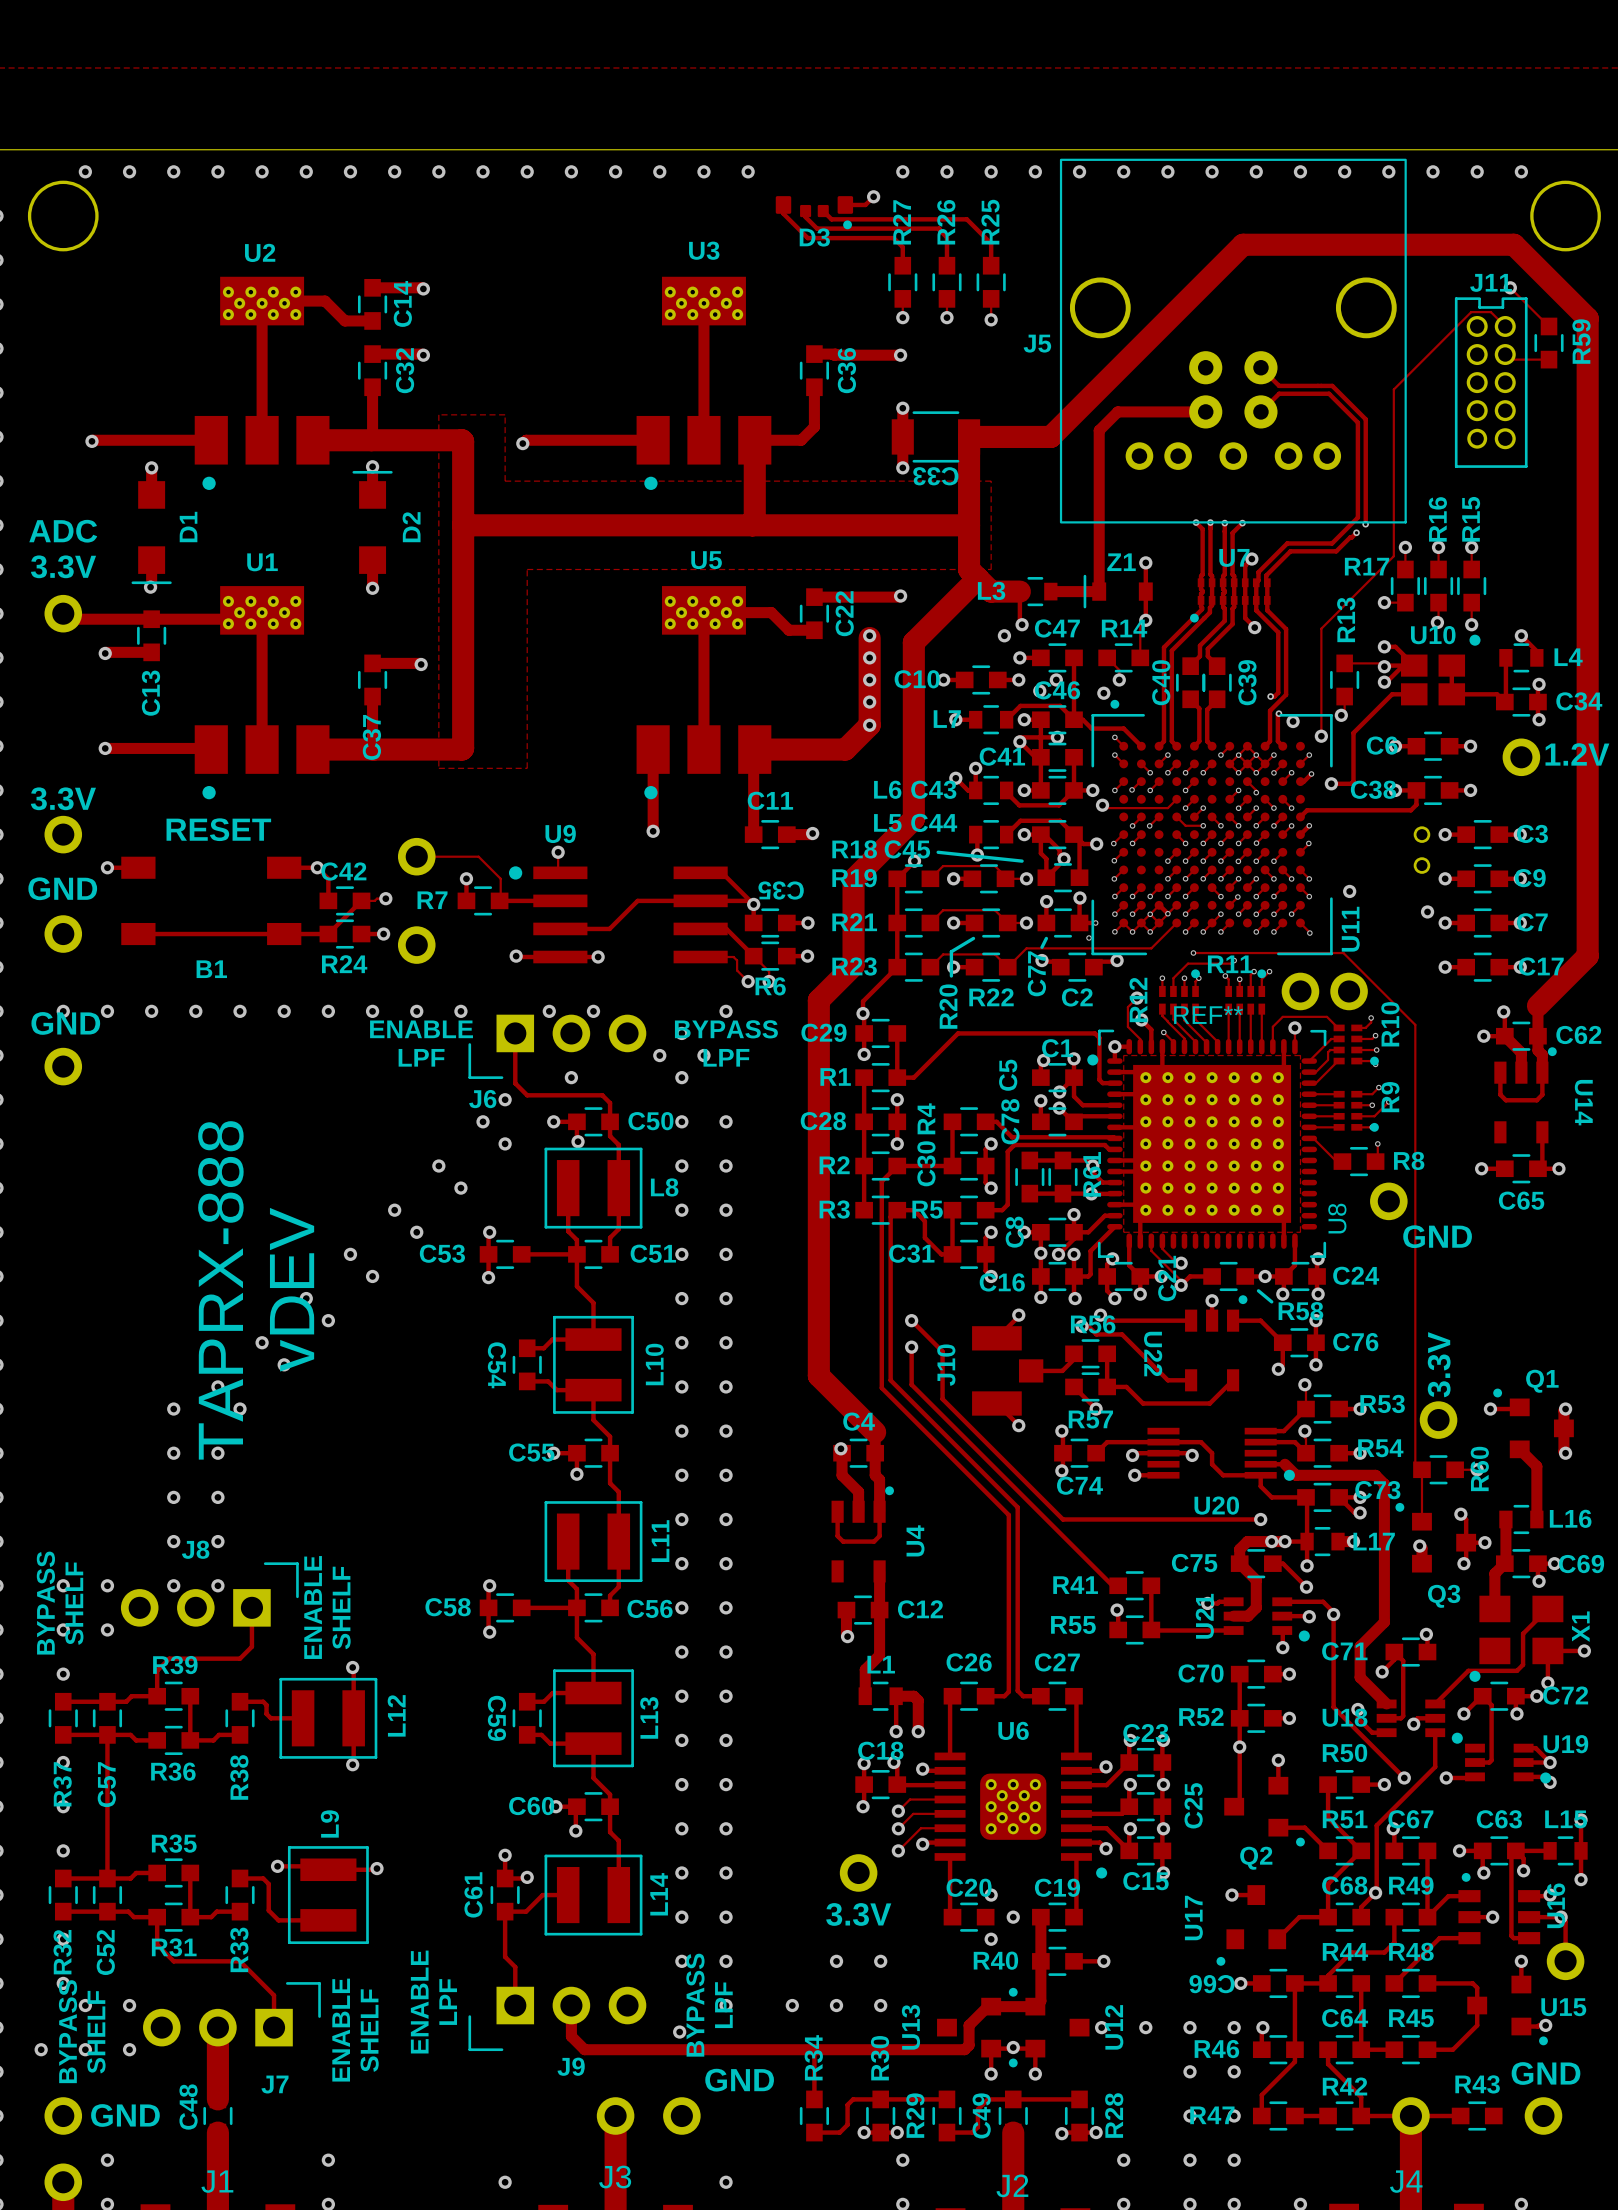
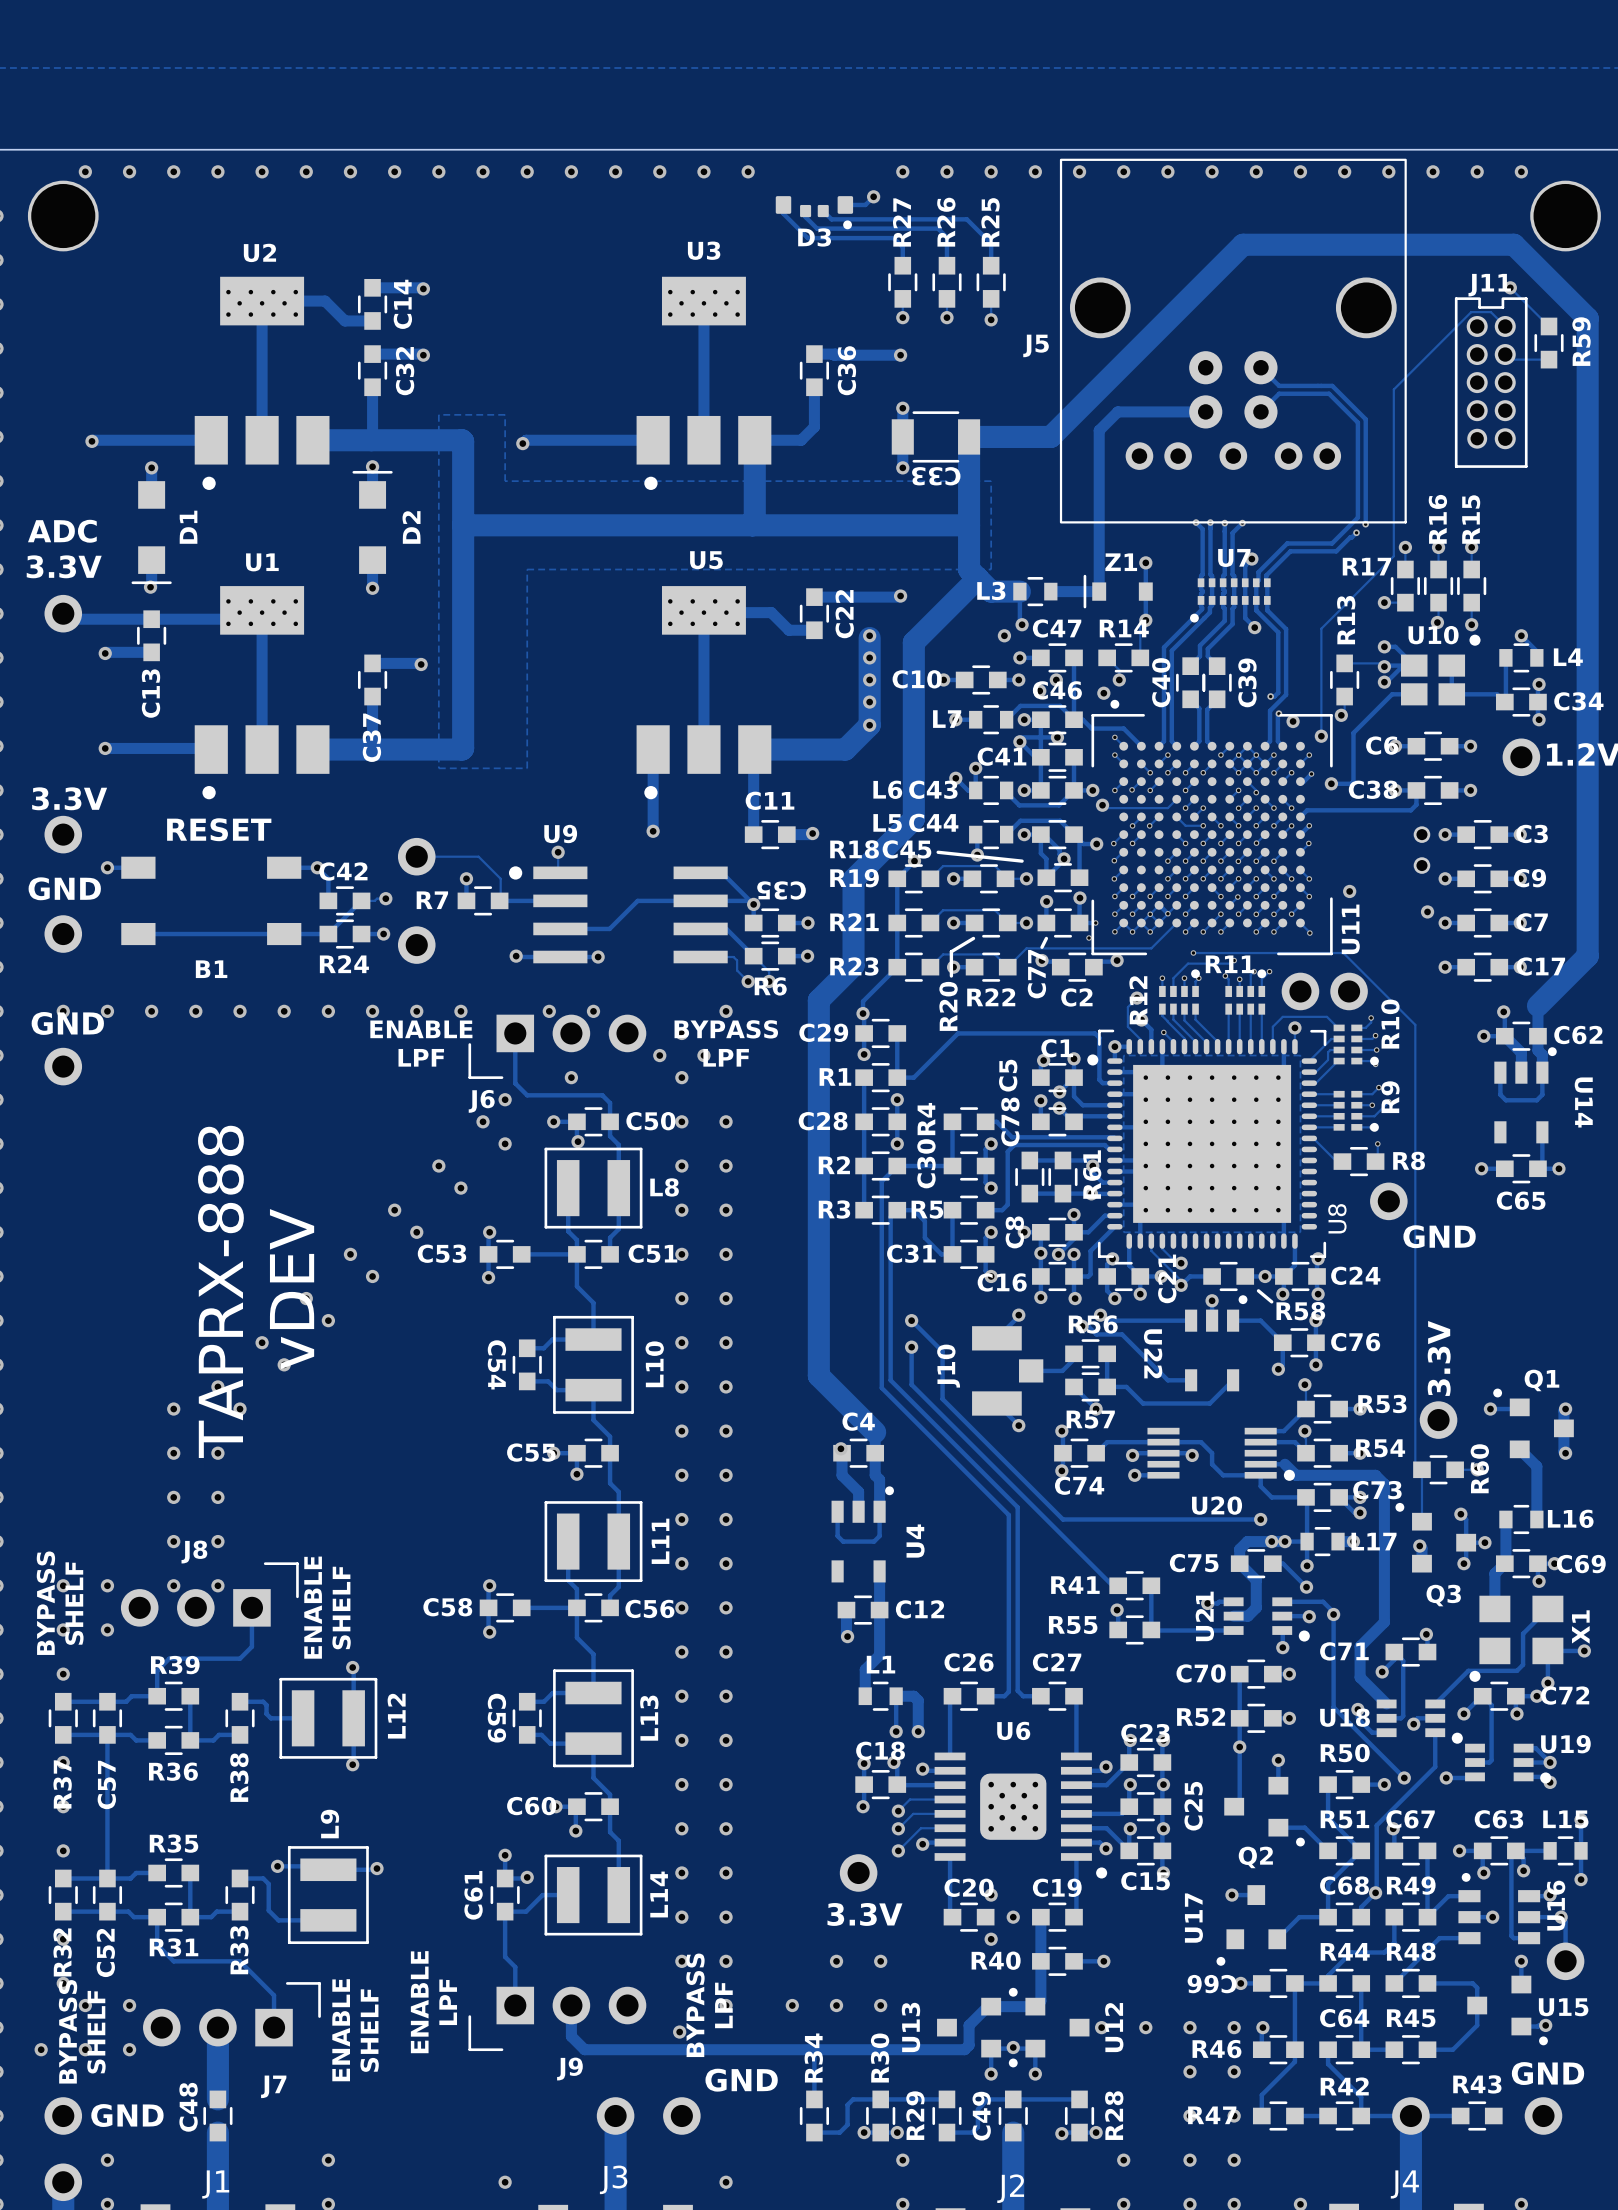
U8 text: REF** (1208, 1015) -> none

